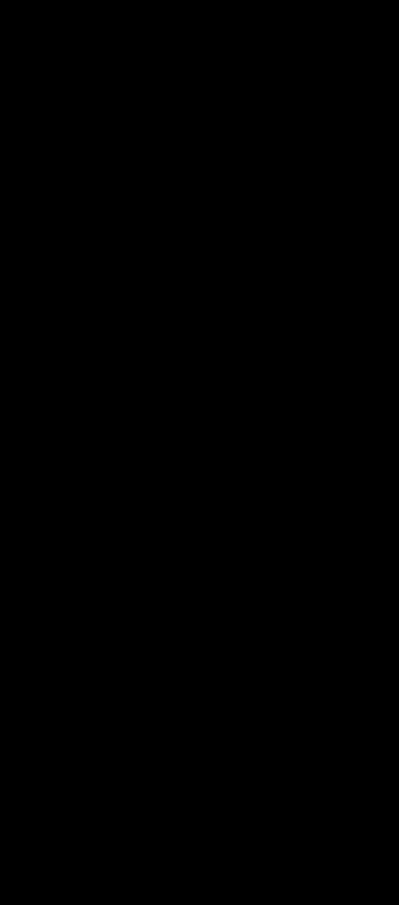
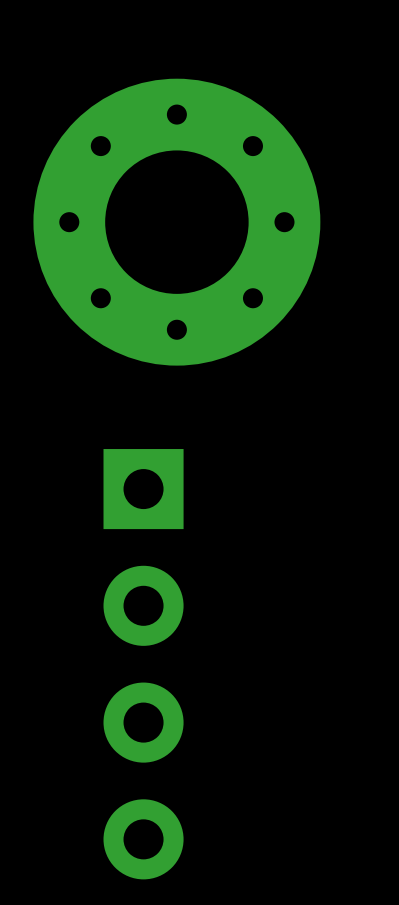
part: none -> (176, 222)
part: none -> (143, 664)

